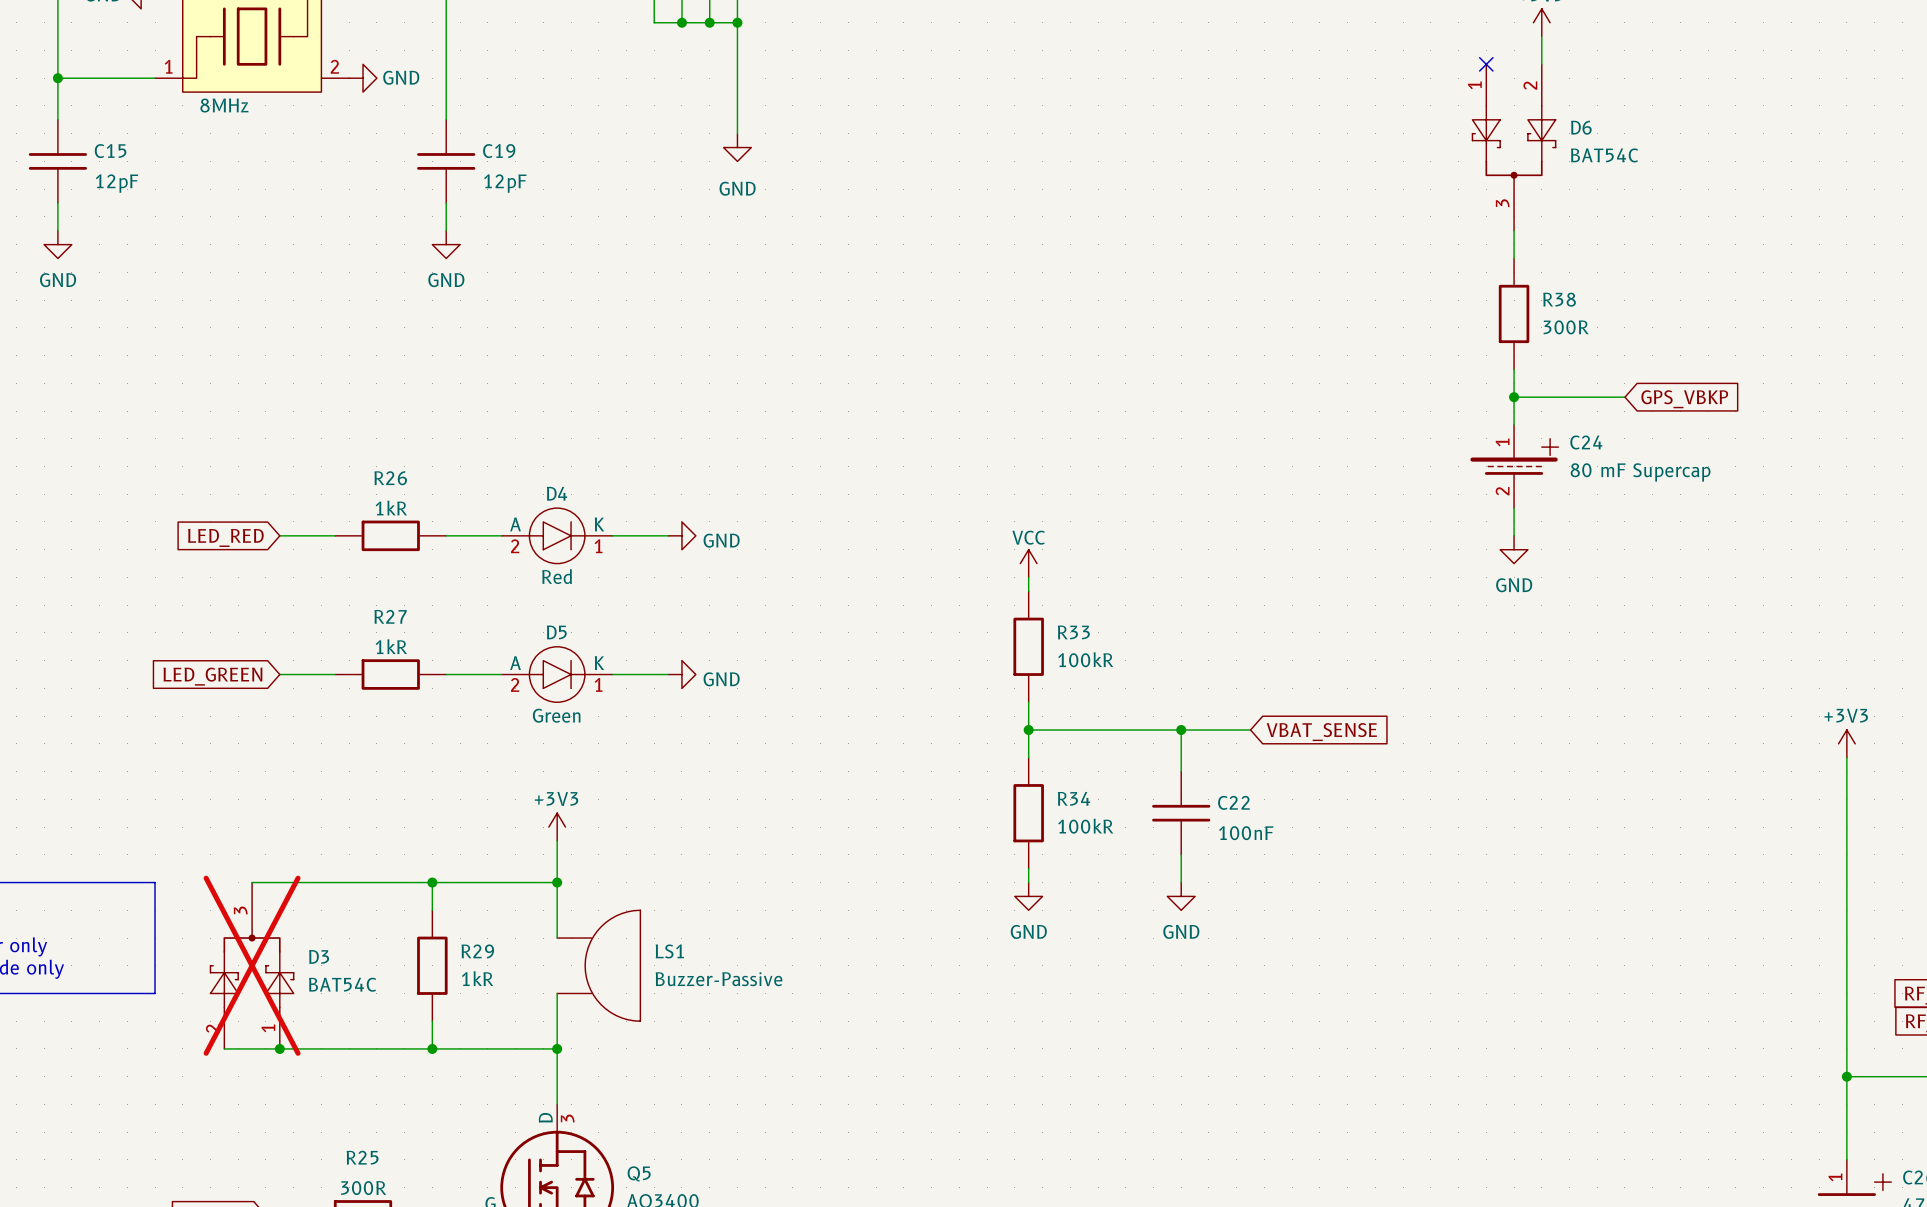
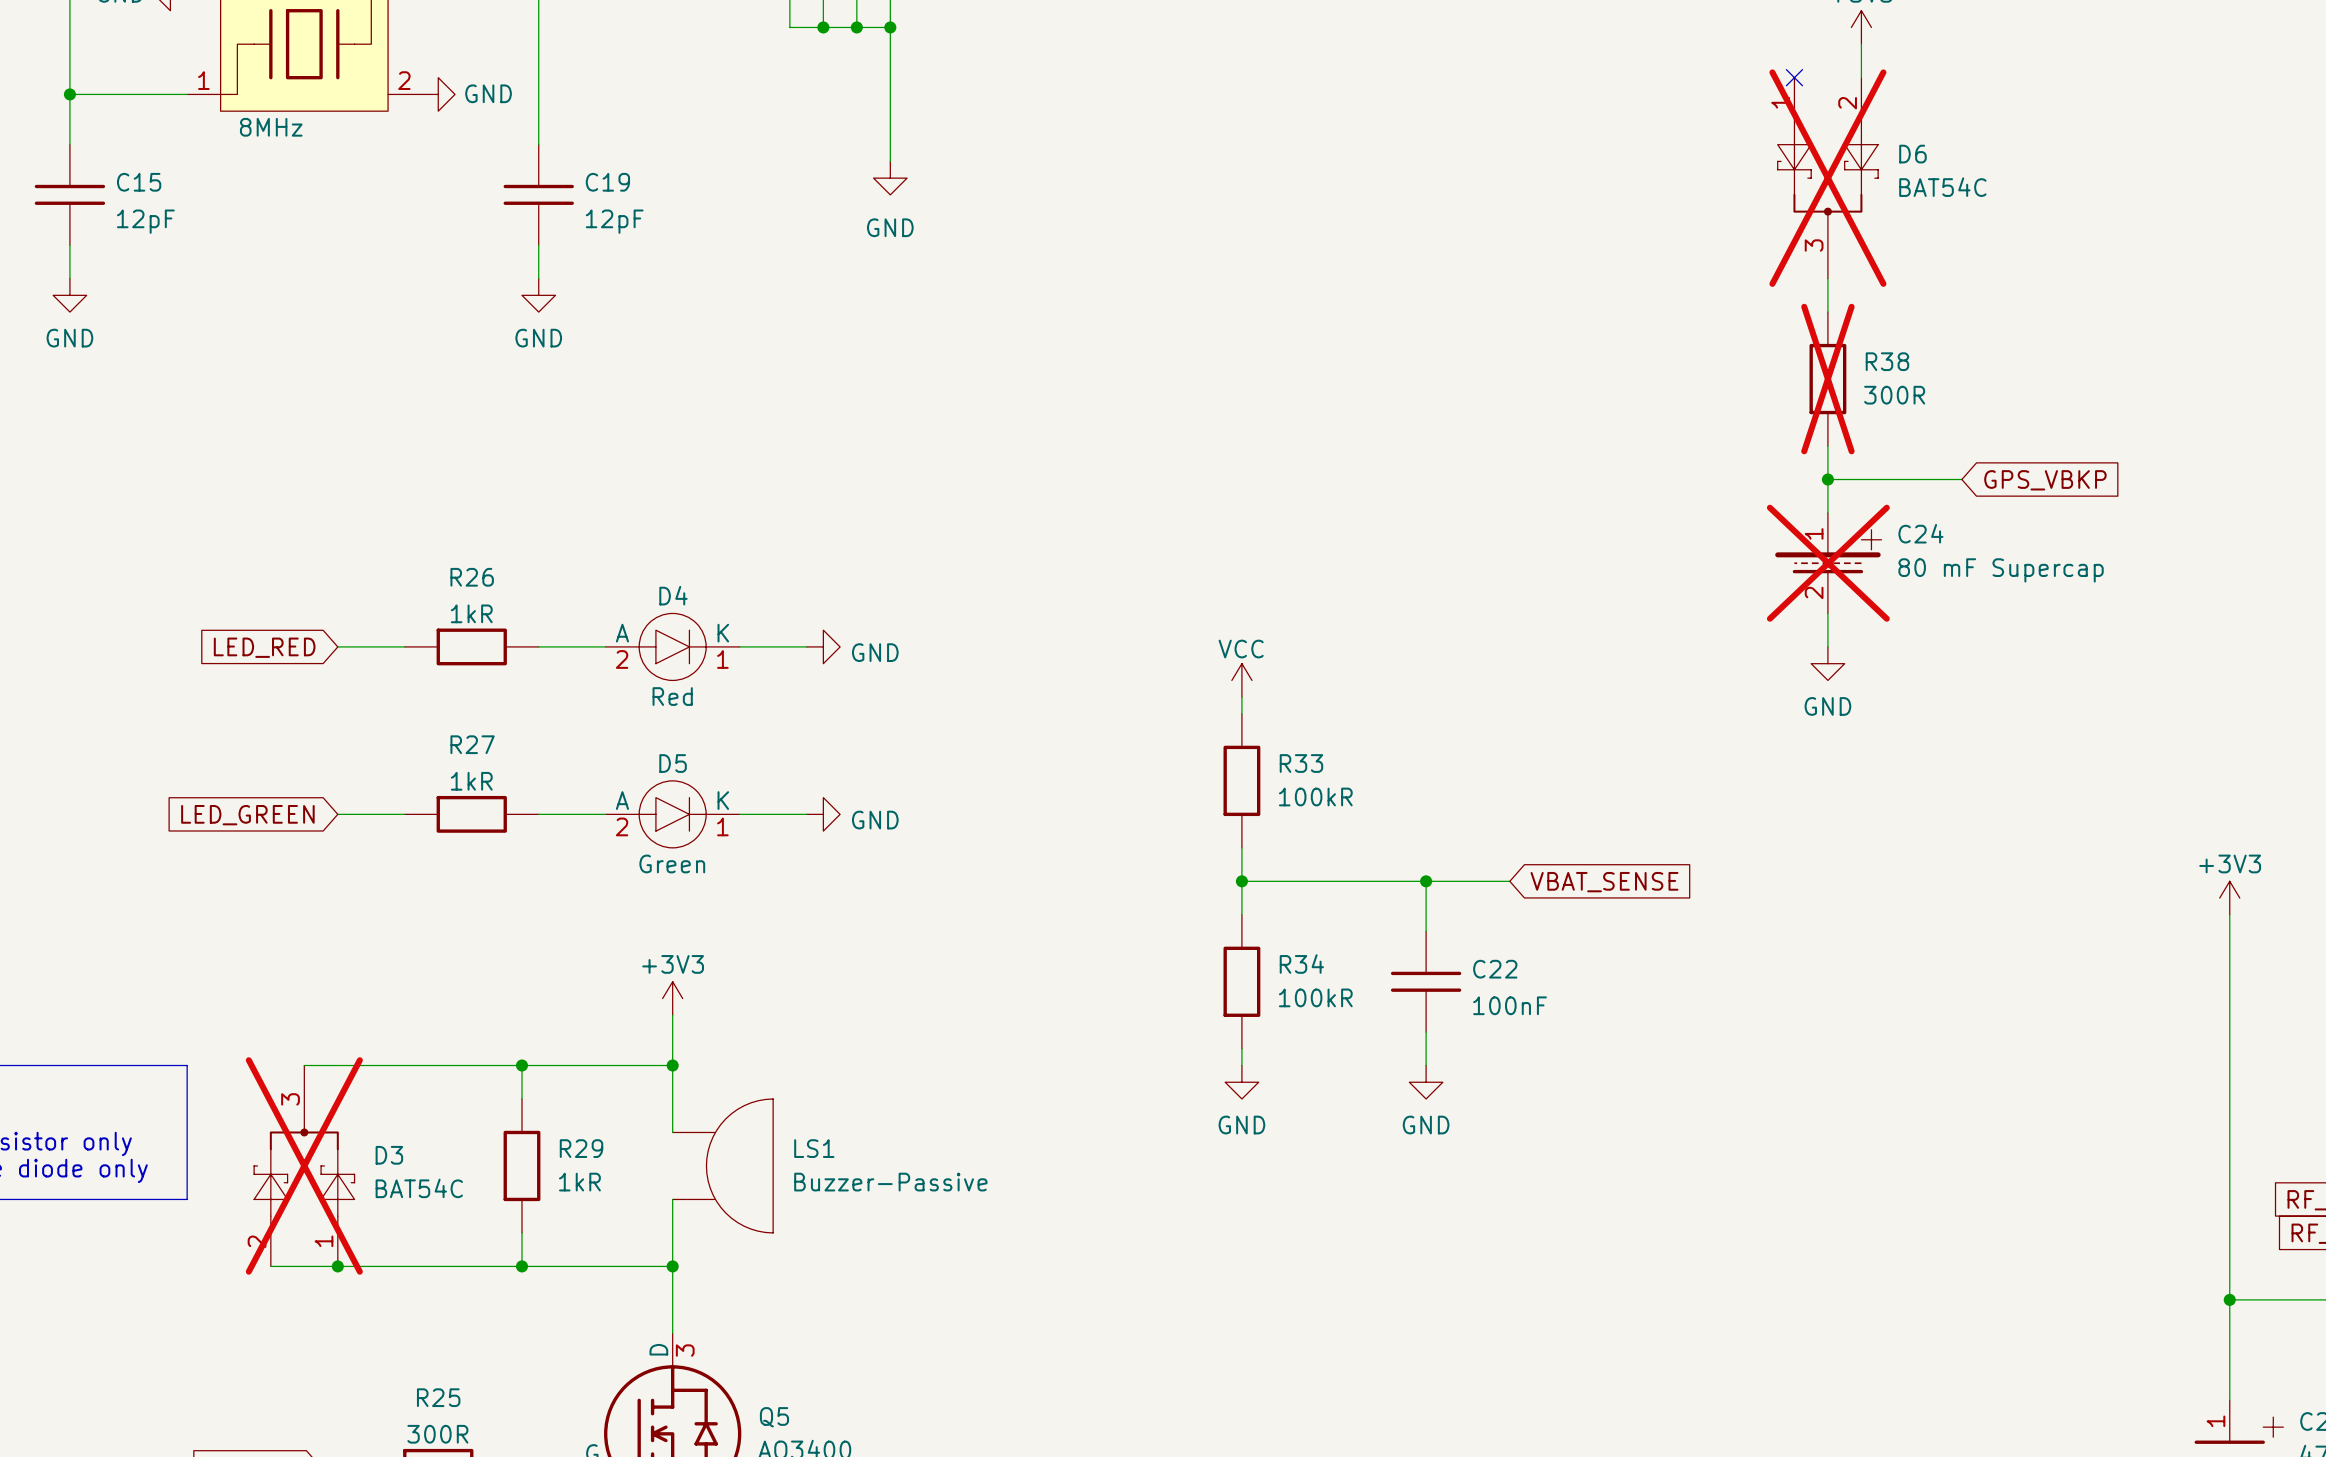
D6 do-not-place cross: none -> (1827, 178)
R38 do-not-place cross: none -> (1827, 379)
C24 do-not-place cross: none -> (1828, 563)

